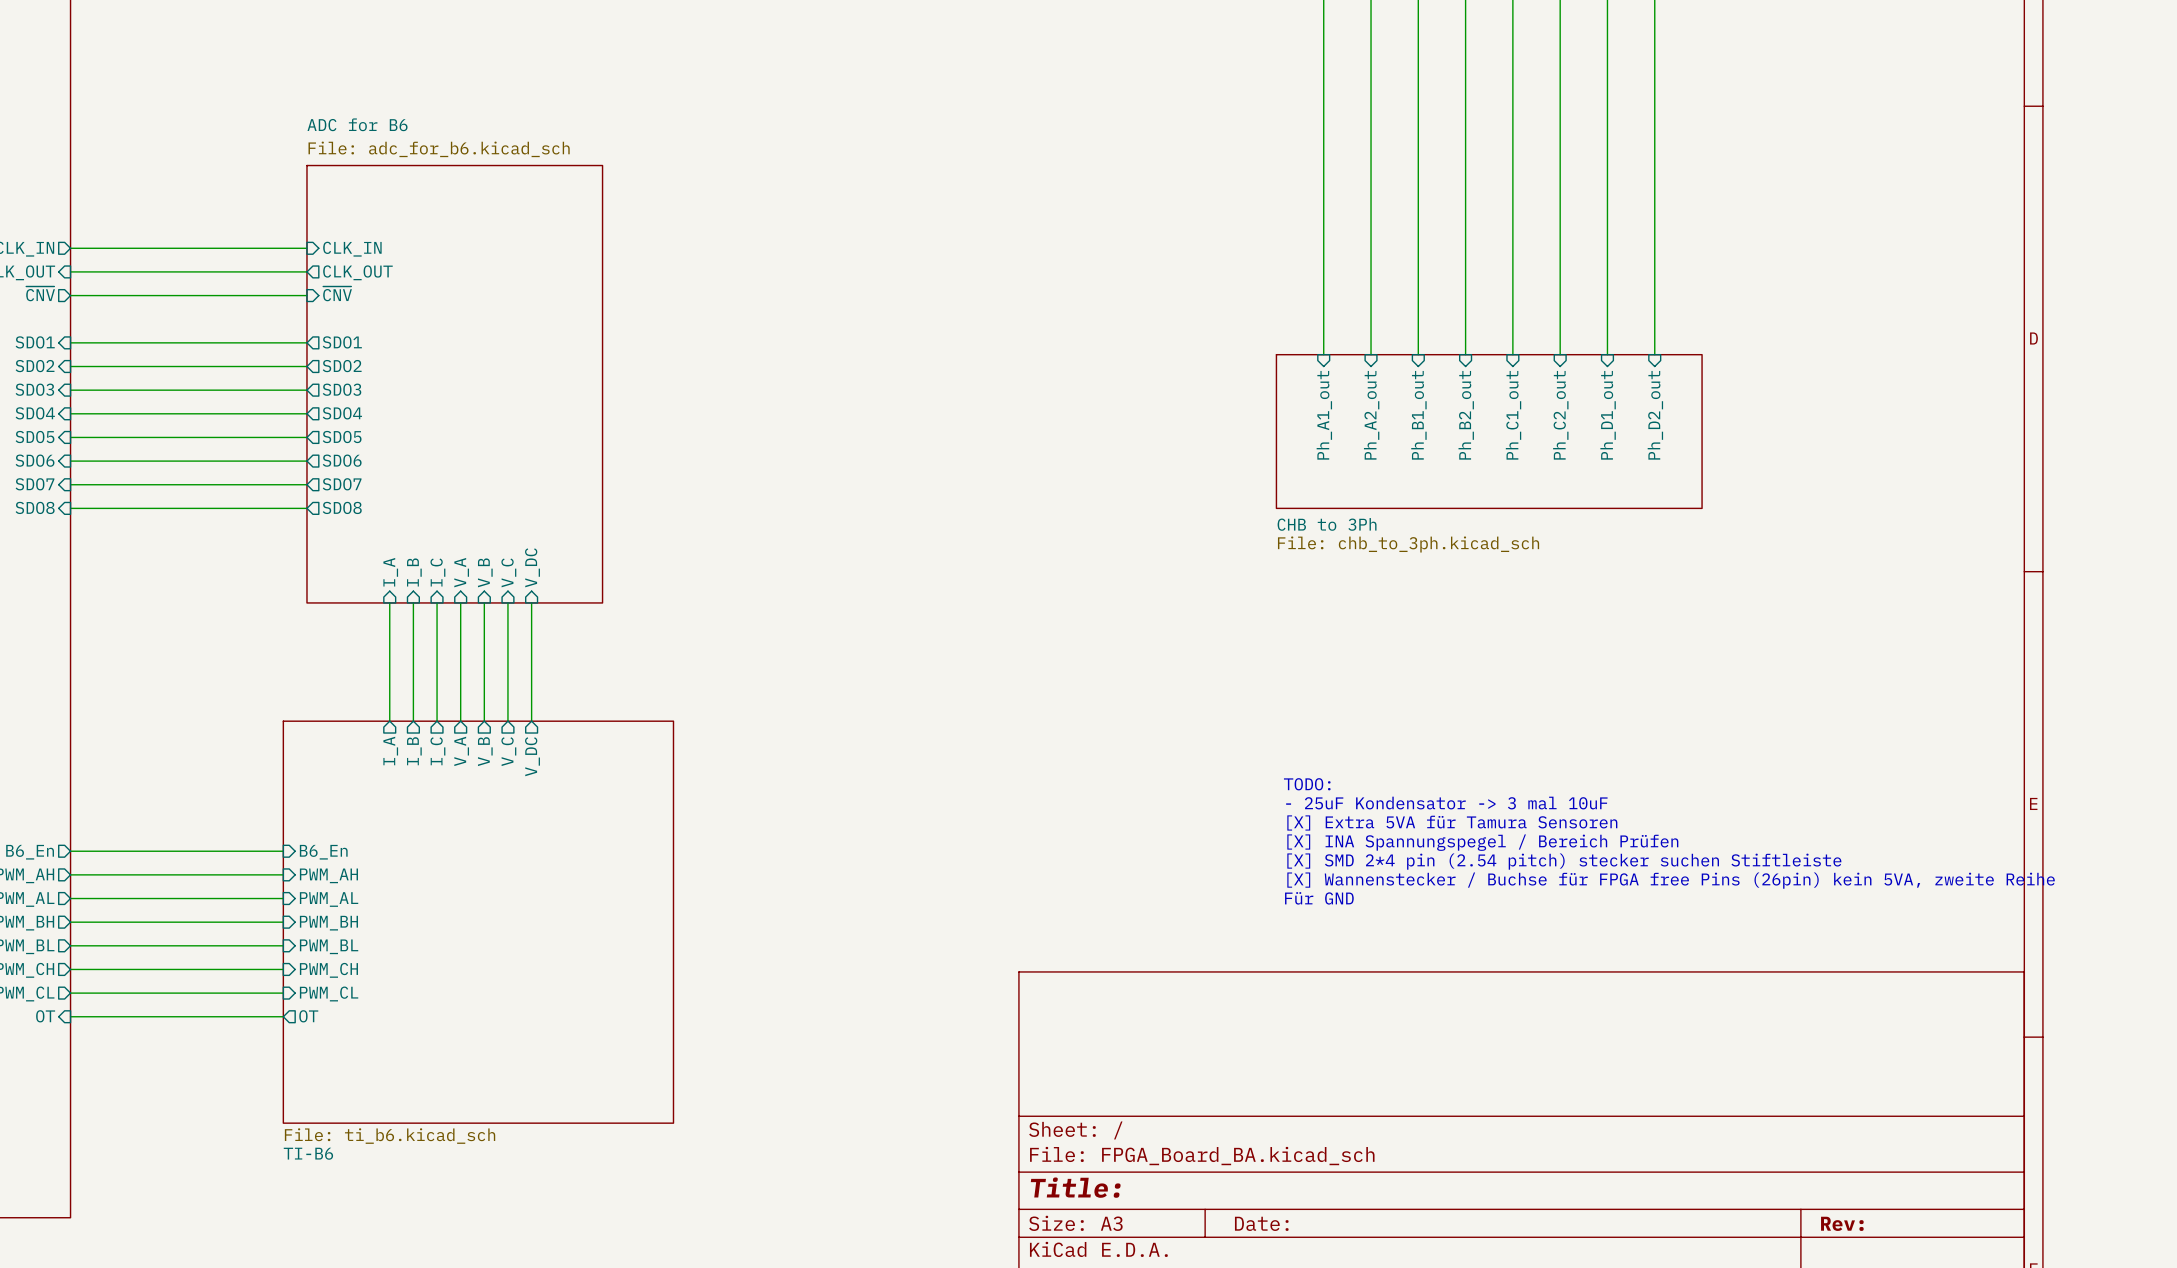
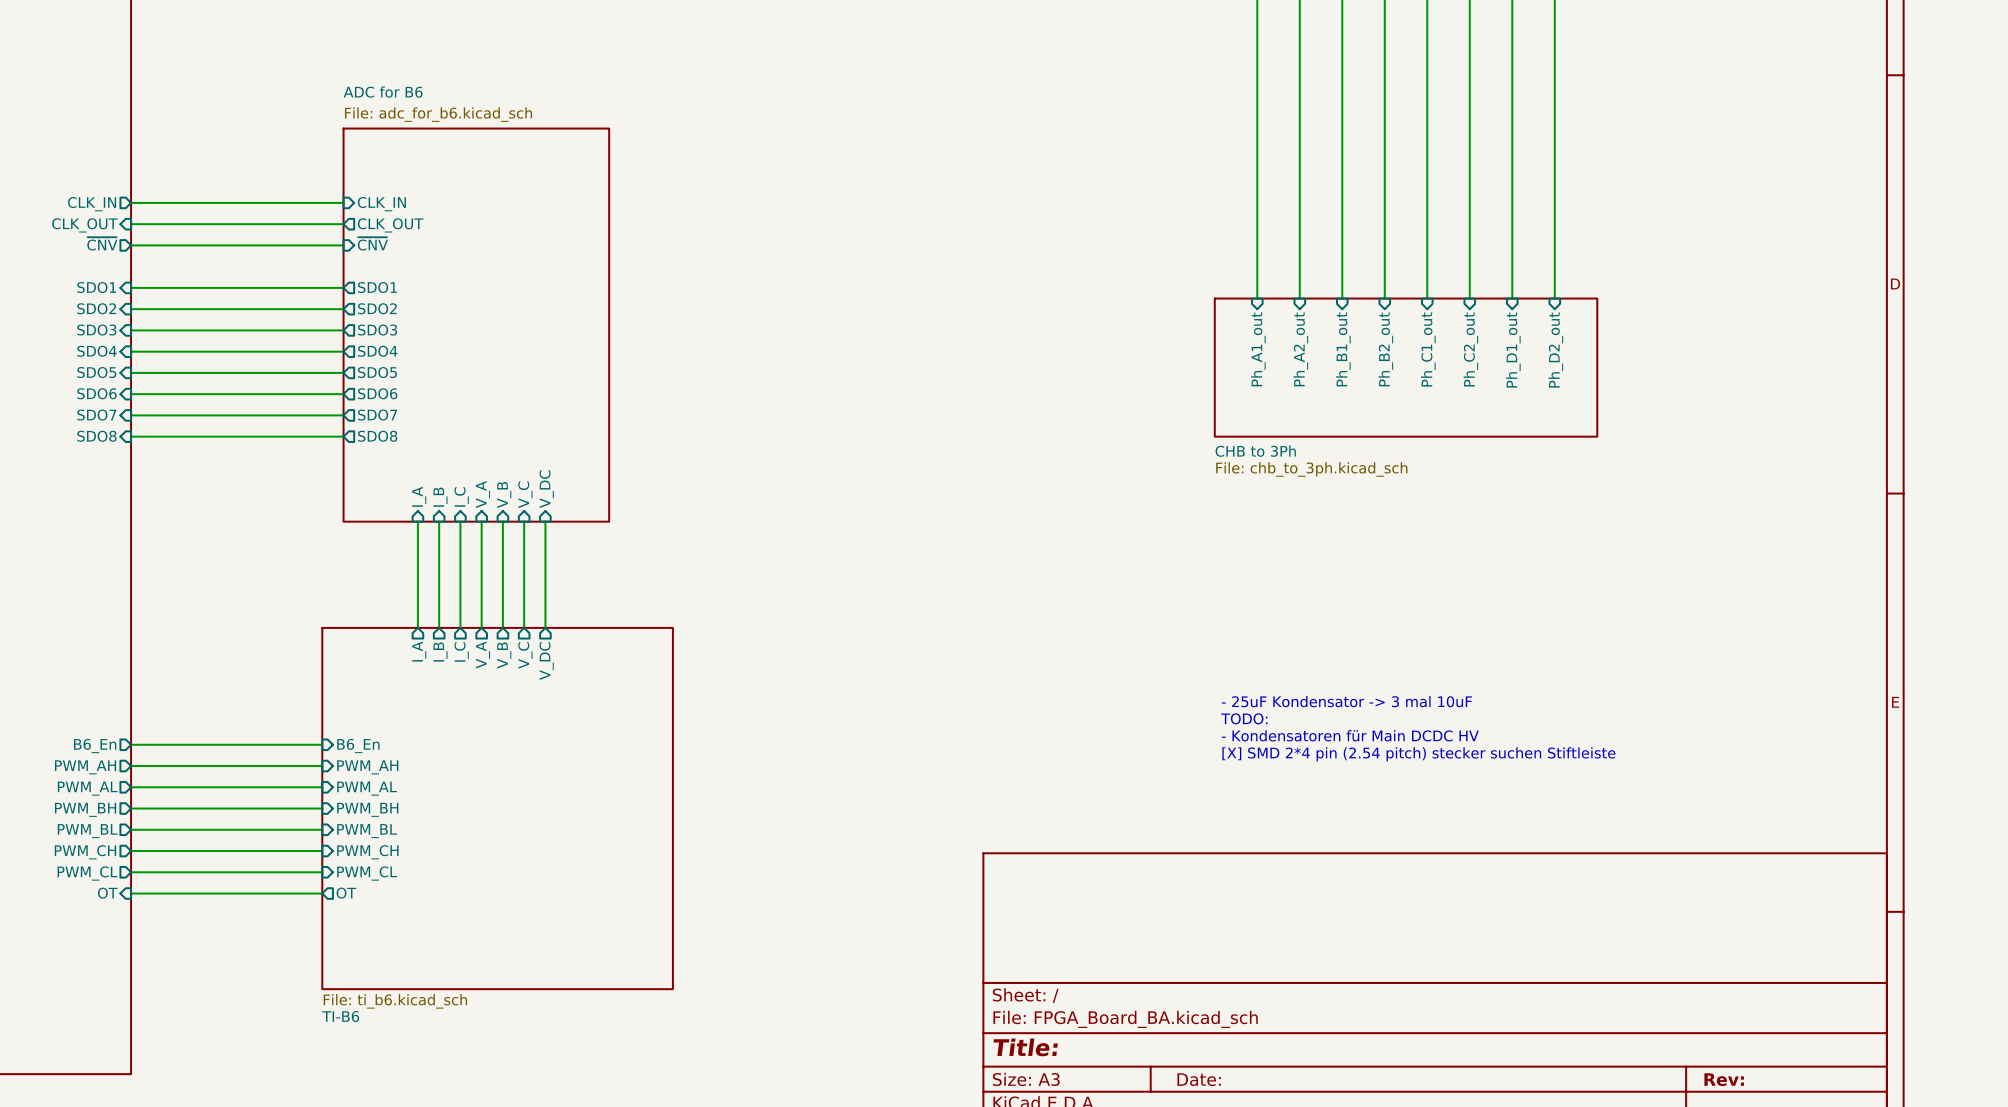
text: TODO: (1307, 784) -> none
text: [X] Extra 5VA für Tamura Sensoren (1452, 822) -> TODO: (1244, 718)
text: [X] INA Spannungspegel / Bereich Prüfen (1482, 842) -> - Kondensatoren für Main DCDC HV (1350, 735)
text: [X] Wannenstecker / Buchse für FPGA free Pins (26pin) kein 5VA, zweite Reihe (1671, 880) -> none
text: Für GND (1319, 898) -> none

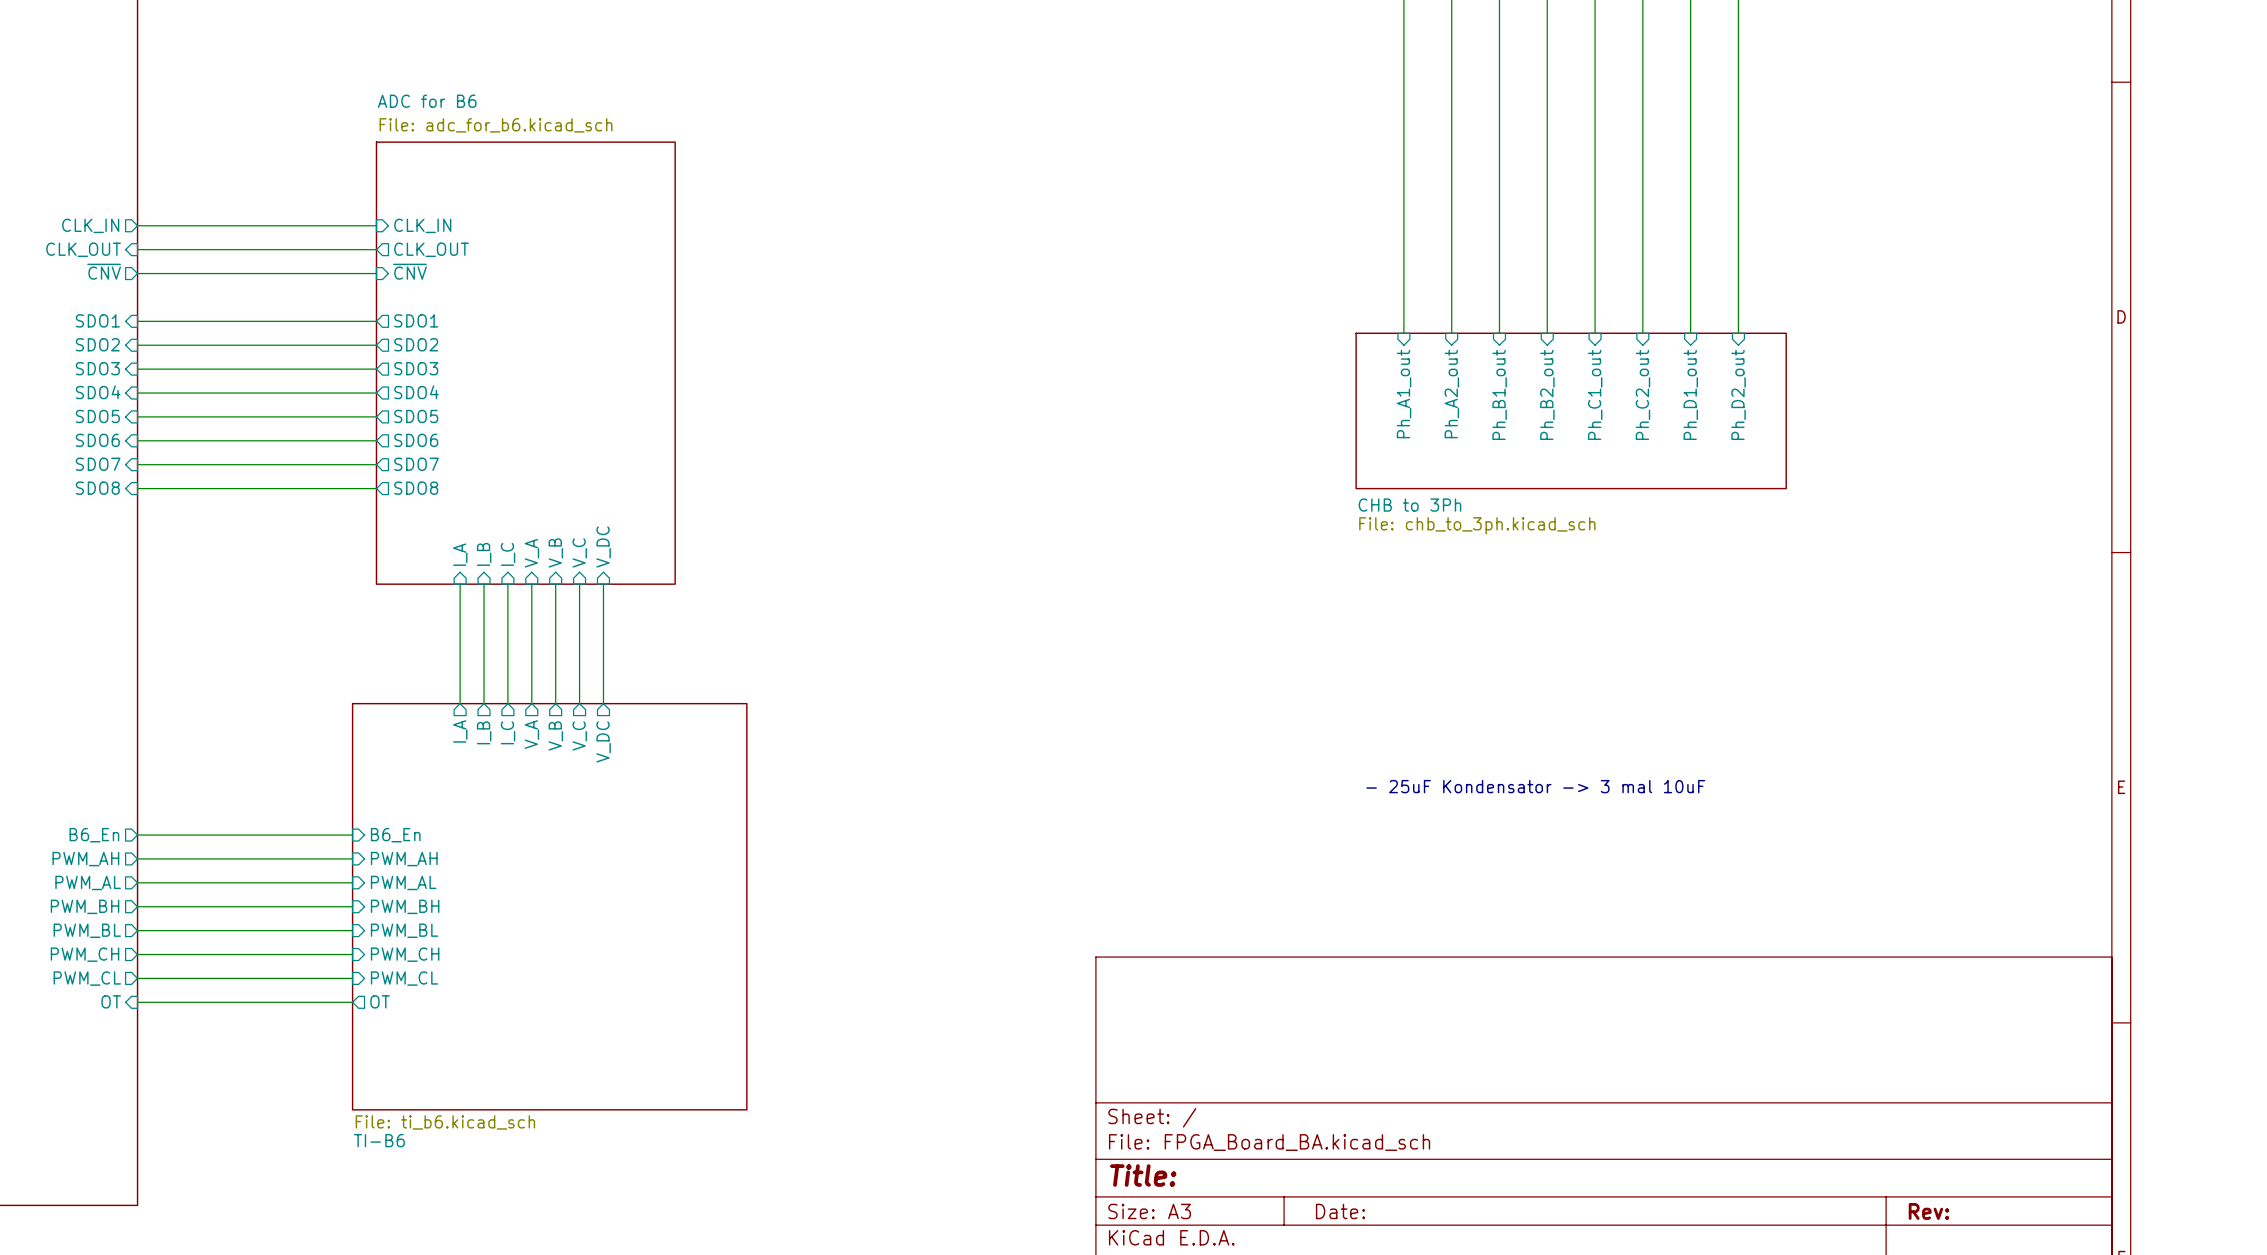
text: TODO: (1244, 718) -> none
text: - Kondensatoren für Main DCDC HV (1350, 735) -> none
text: [X] SMD 2*4 pin (2.54 pitch) stecker suchen Stiftleiste (1418, 754) -> none

